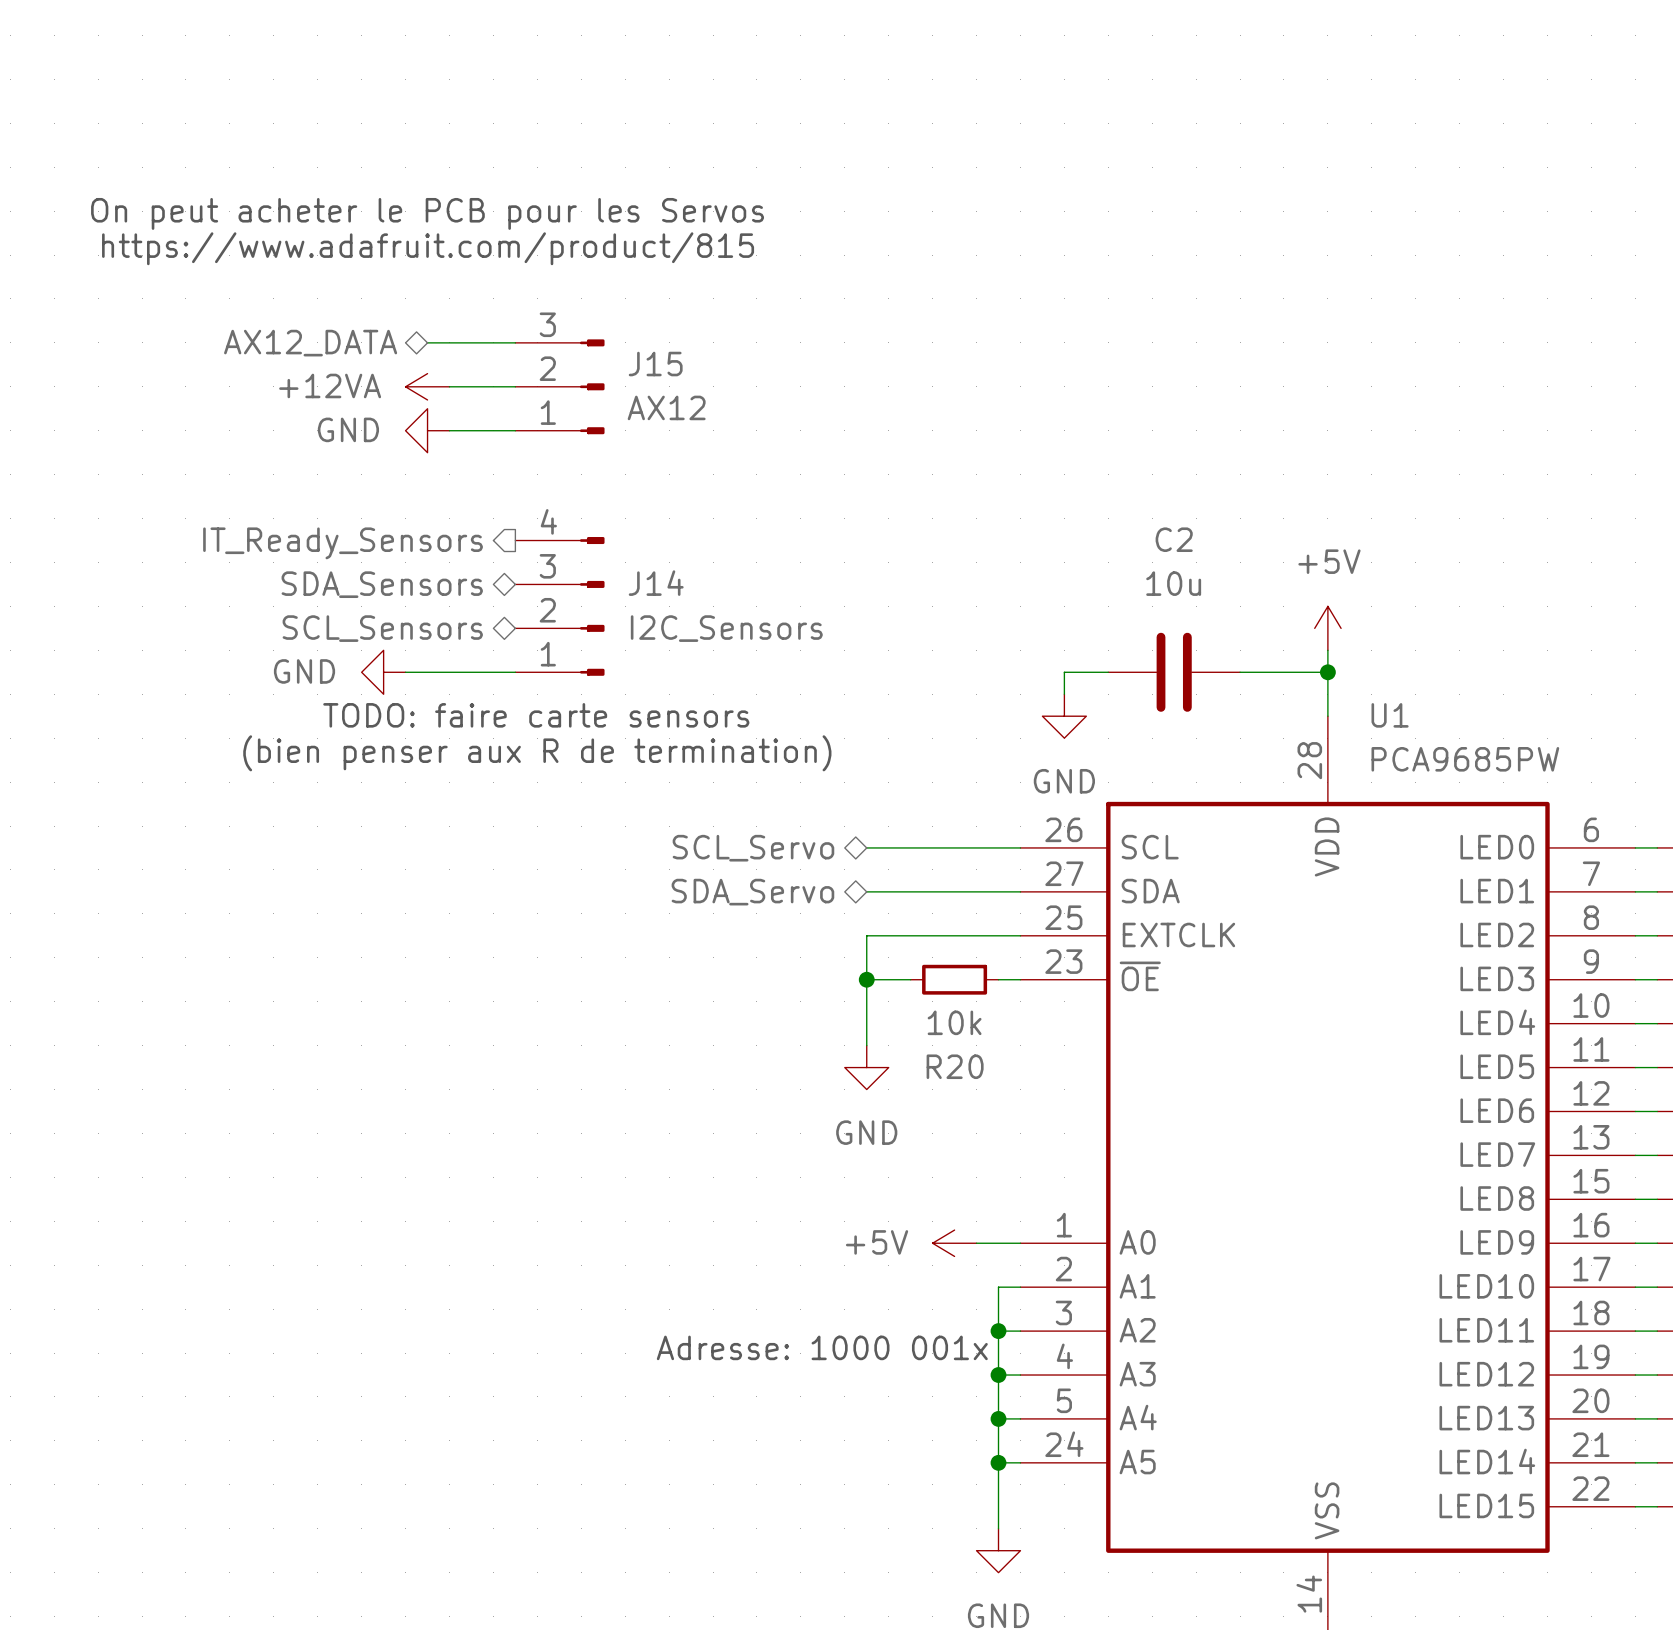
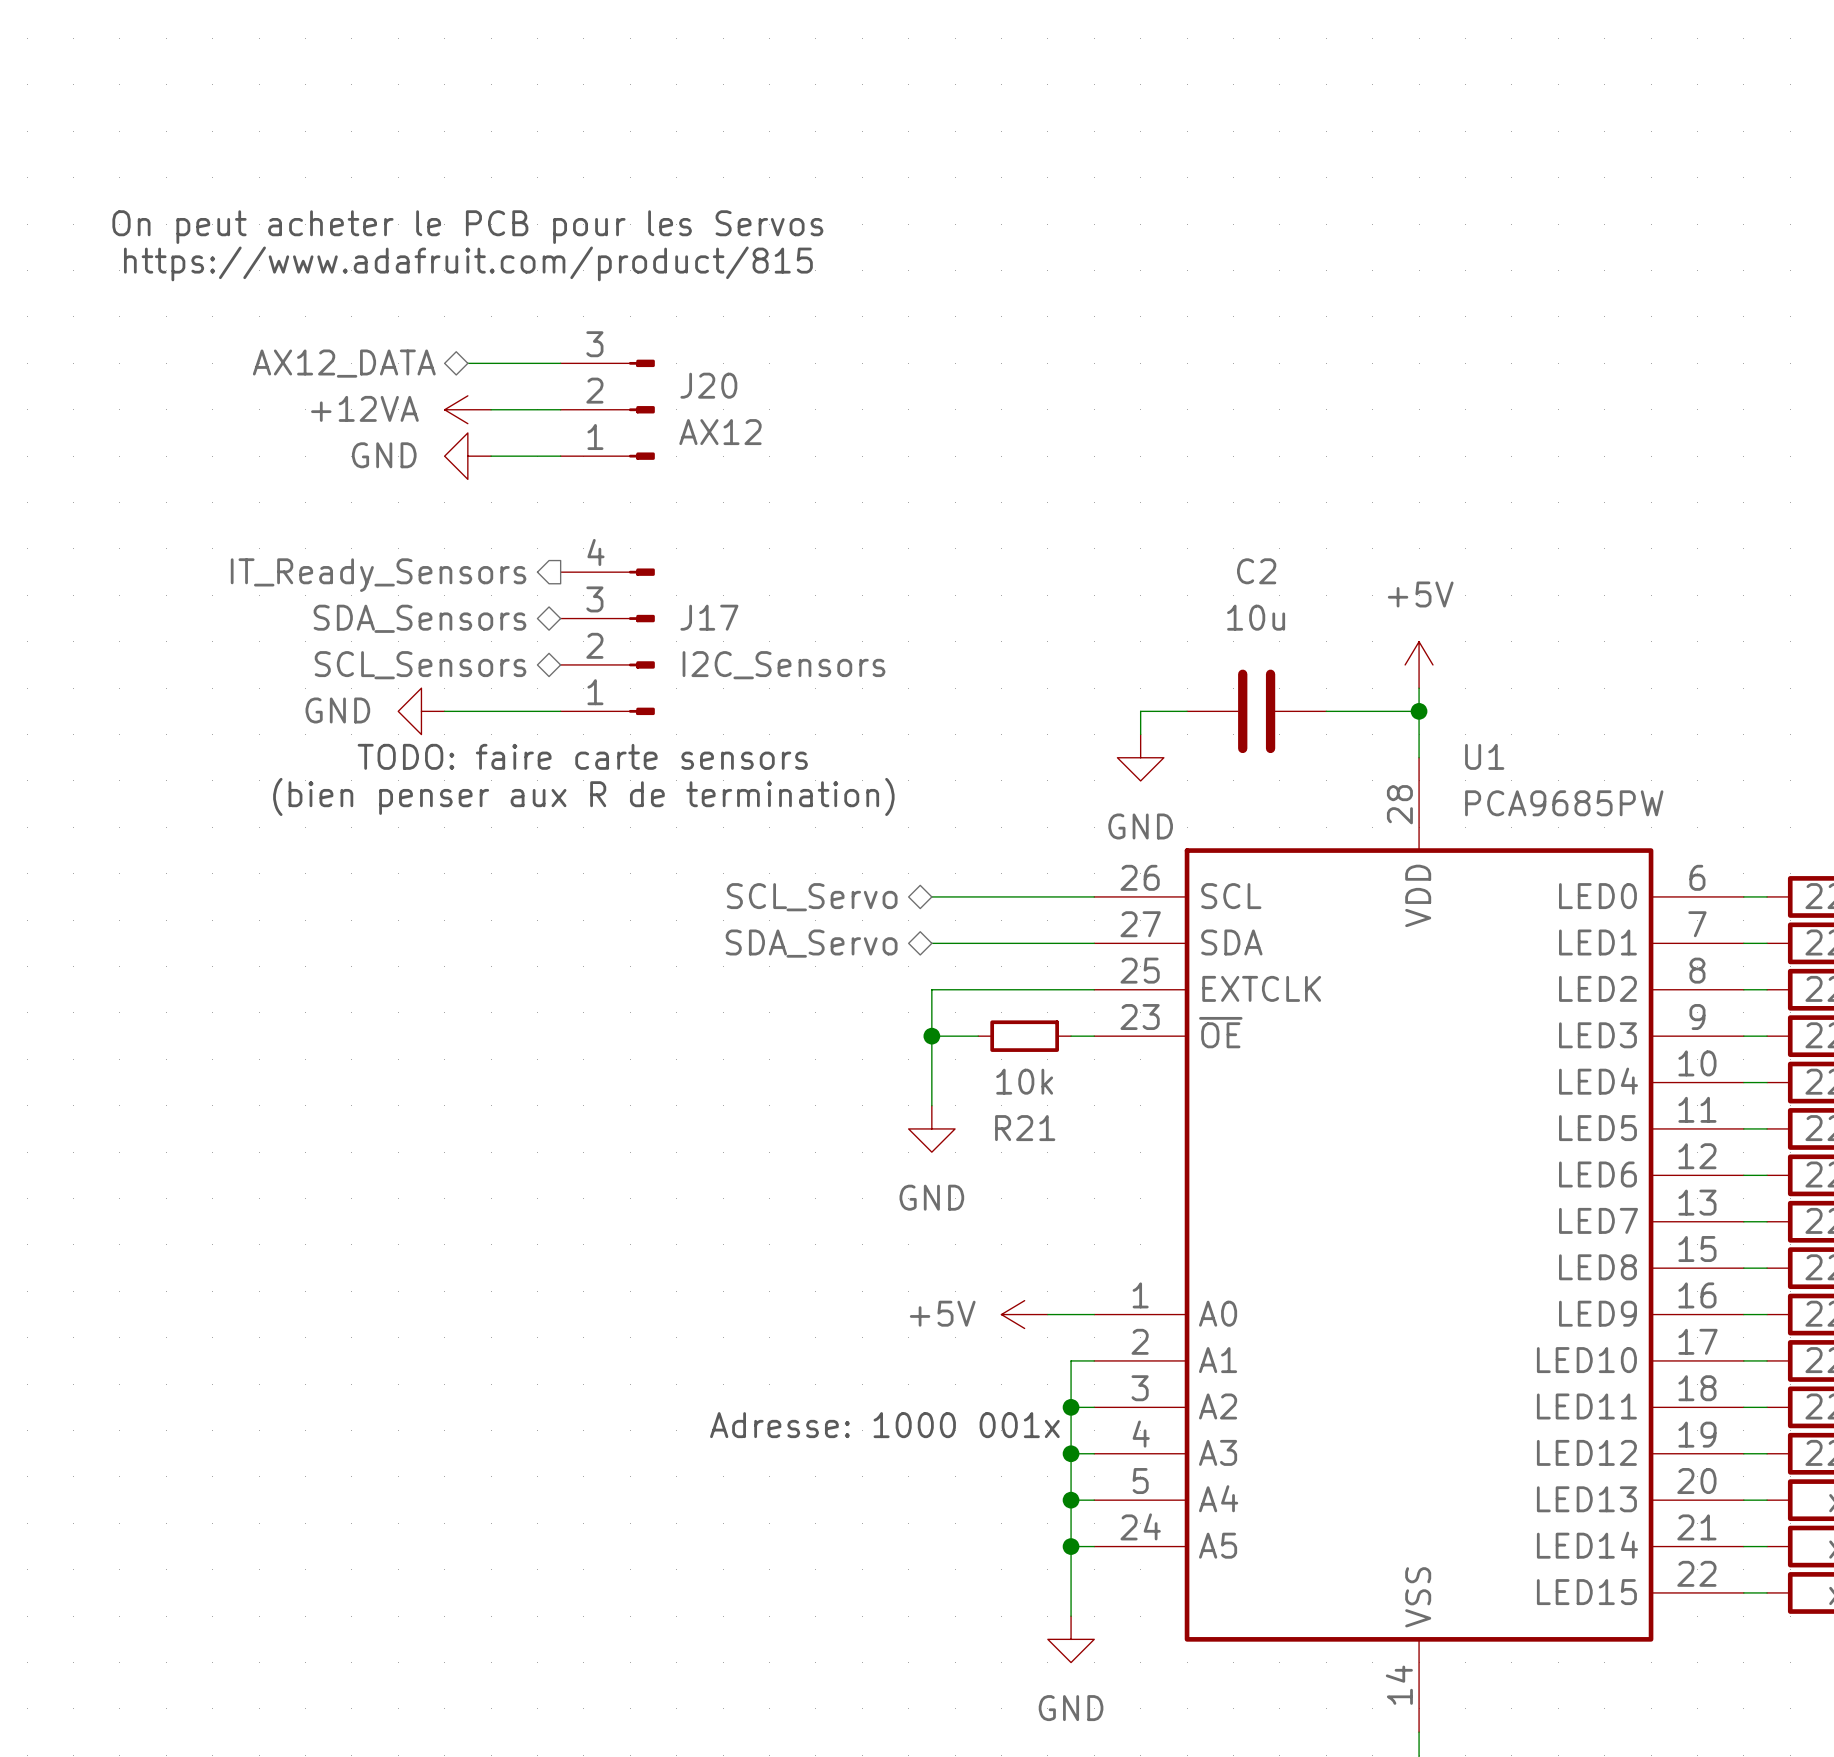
J15 name: J15 (655, 364) -> J20 (708, 385)
J14 name: J14 (656, 583) -> J17 (709, 617)
R20 name: R20 (955, 1066) -> R21 (1025, 1128)

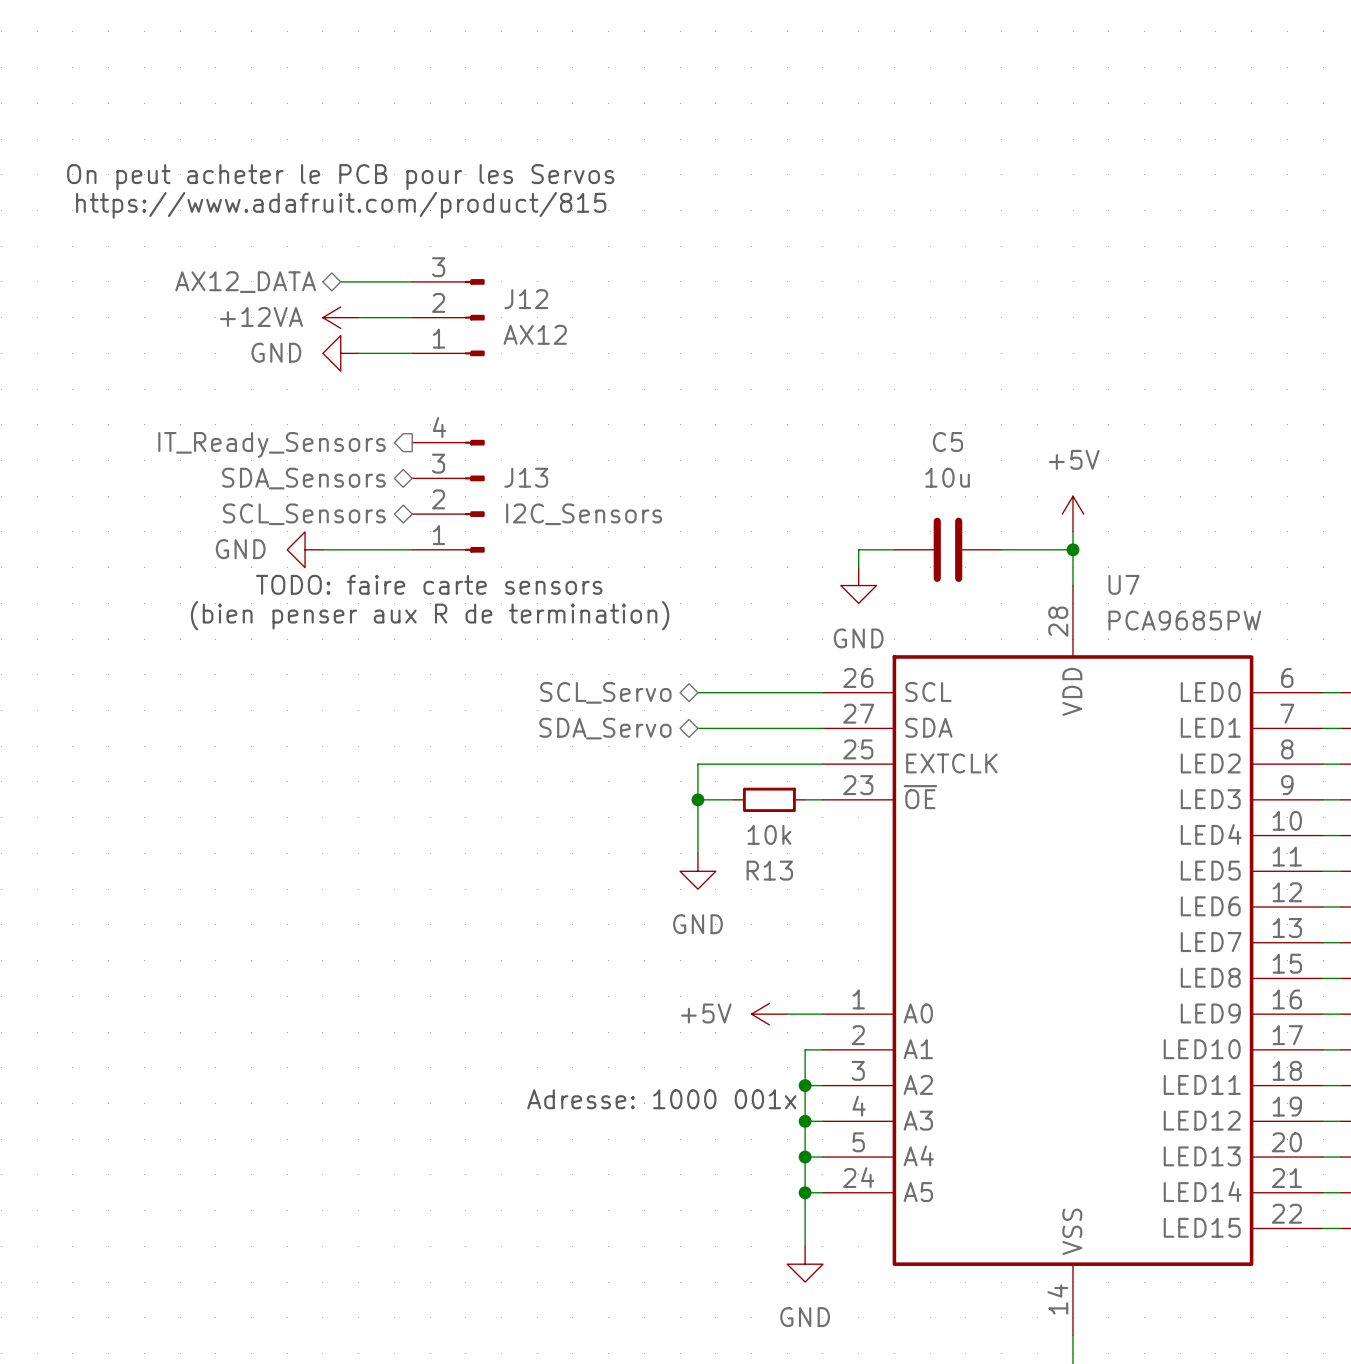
J20 name: J20 (708, 385) -> J12 (526, 299)
C2 name: C2 (1256, 571) -> C5 (947, 441)
J17 name: J17 (709, 617) -> J13 (526, 477)
U1 name: U1 (1484, 756) -> U7 (1123, 584)
R21 name: R21 (1025, 1128) -> R13 (769, 870)

